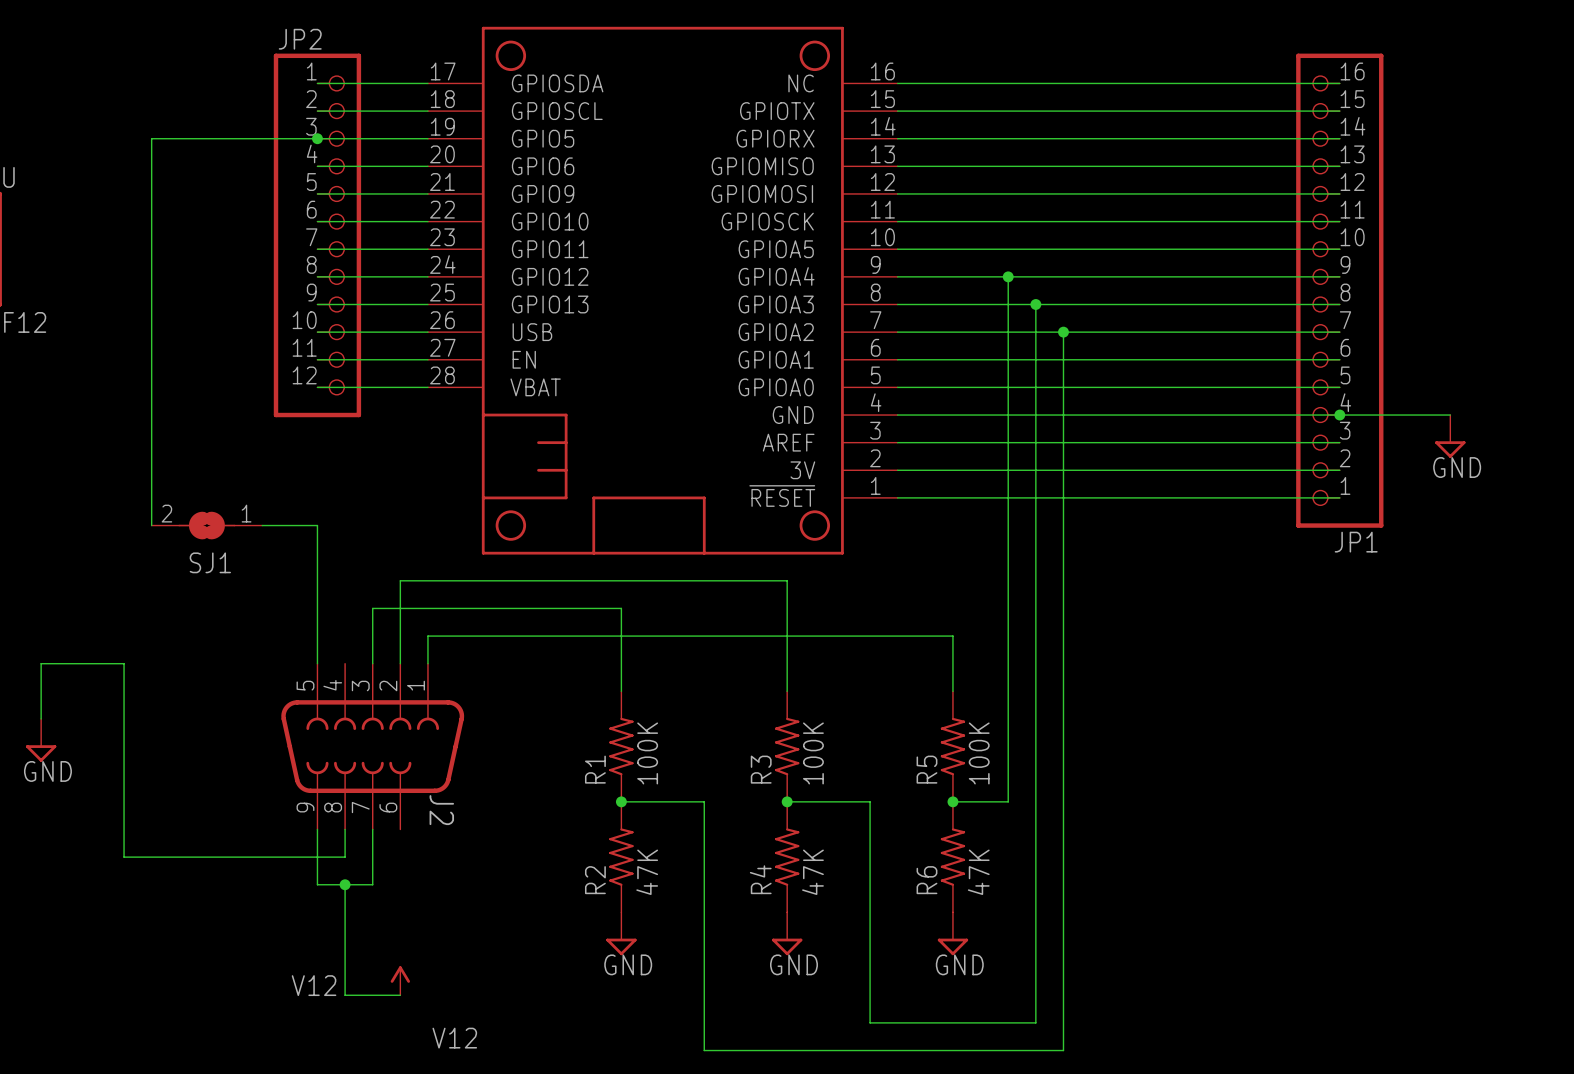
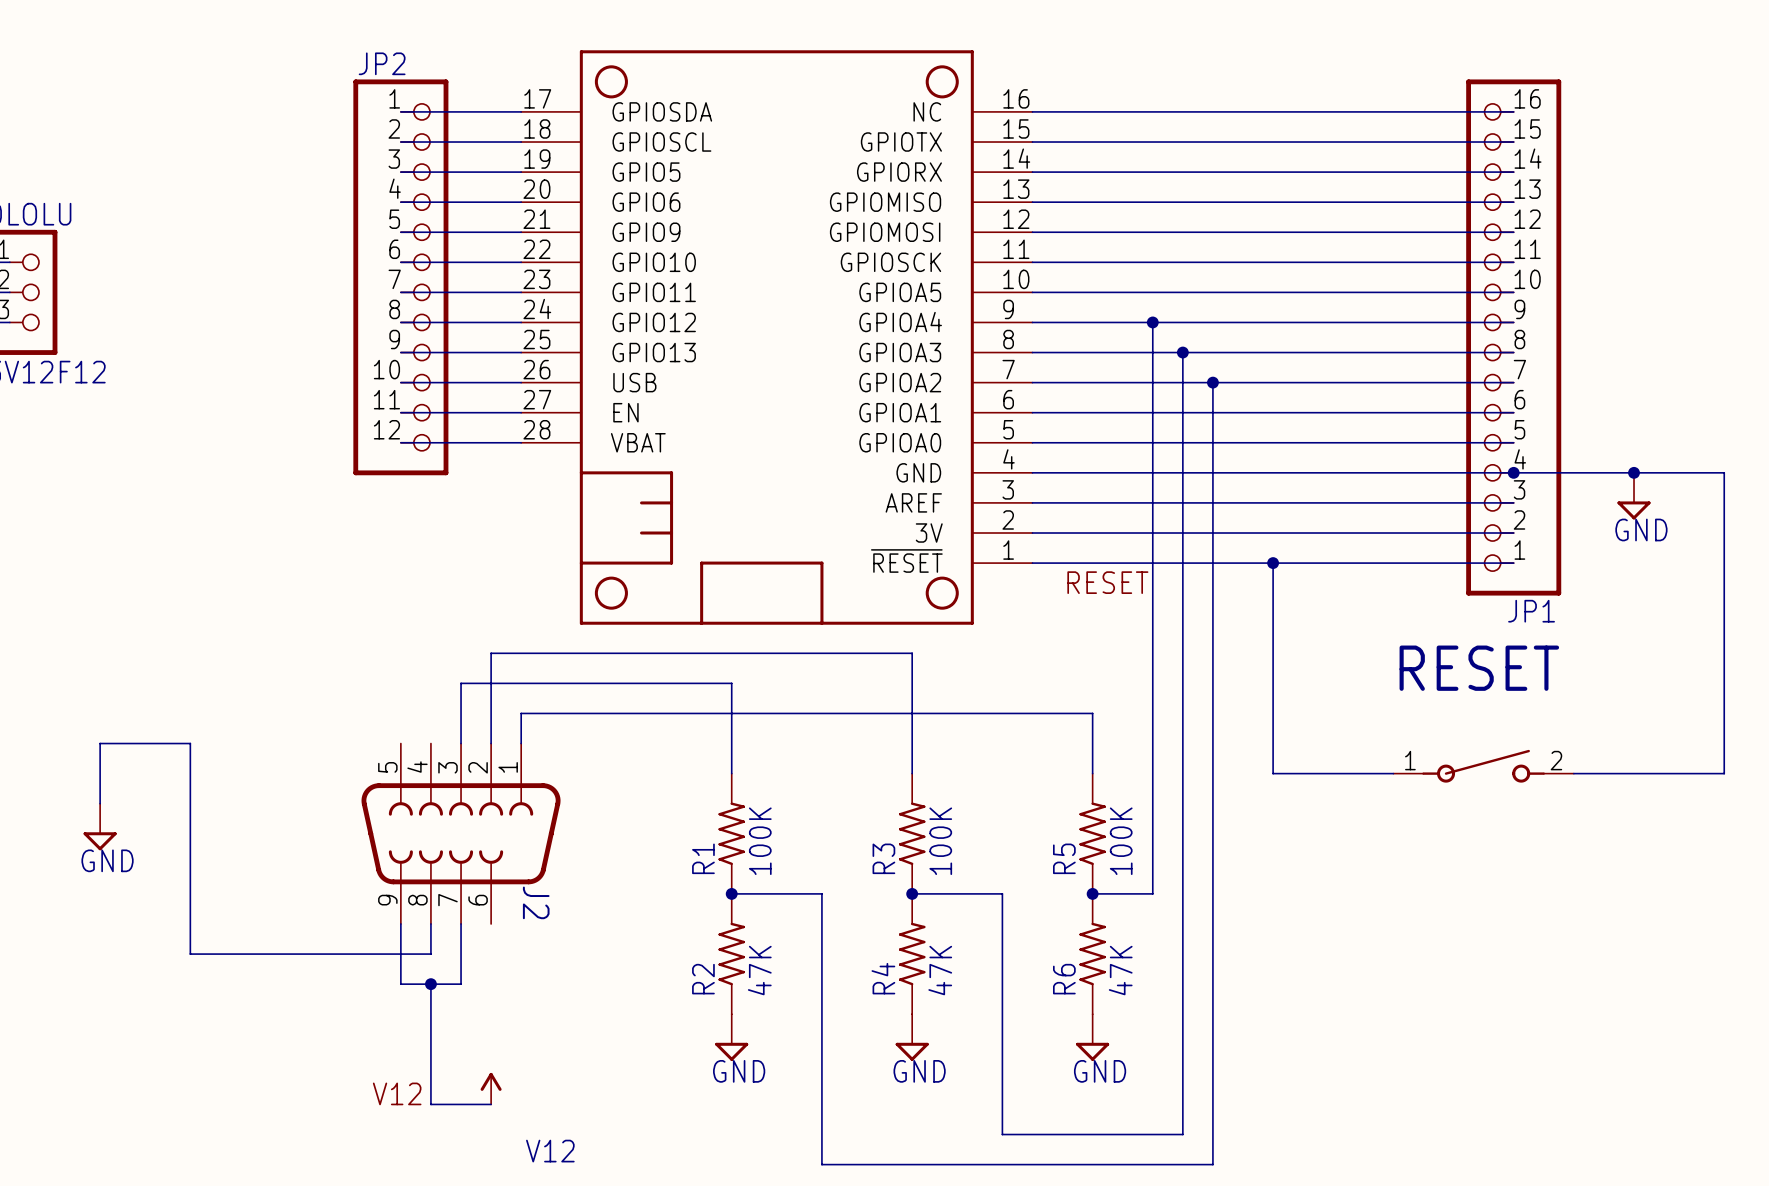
wire: (317, 138) (151, 138) (151, 525) -> none
junction: (317, 138) -> none
wire: none -> (1634, 472) (1724, 472) (1724, 773) (1573, 773)
junction: none -> (1634, 472)
wire: none -> (1273, 563) (1273, 773) (1393, 773)
junction: none -> (1273, 563)
label: none -> RESET (1107, 582)
SJ1: (206, 525) -> none
wire: (262, 525) (317, 525) (317, 663) -> none
RESET: none -> (1483, 766)

